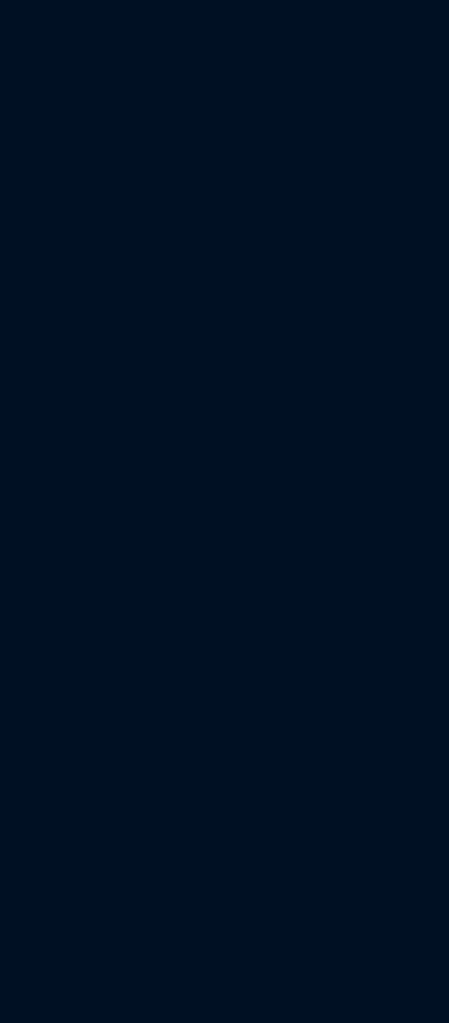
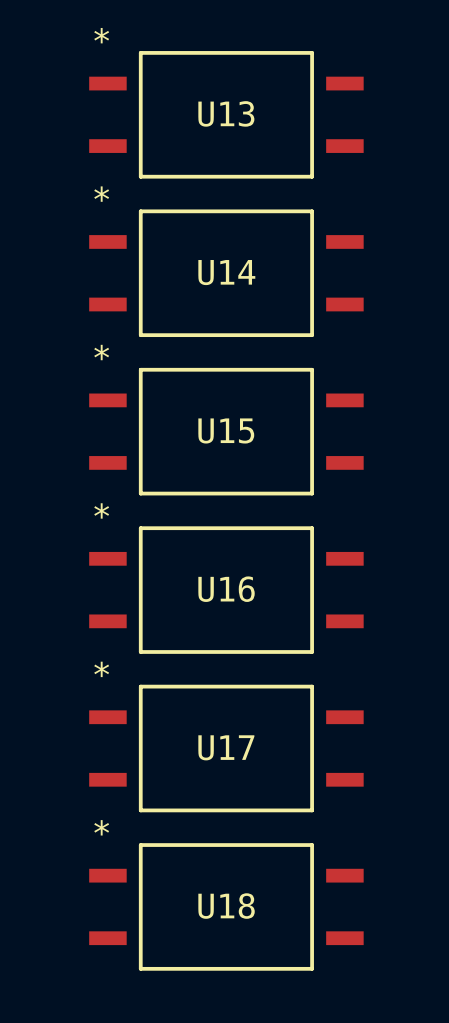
U13: none -> (226, 114)
U14: none -> (226, 273)
U15: none -> (226, 431)
U16: none -> (226, 590)
U17: none -> (226, 748)
U18: none -> (226, 906)

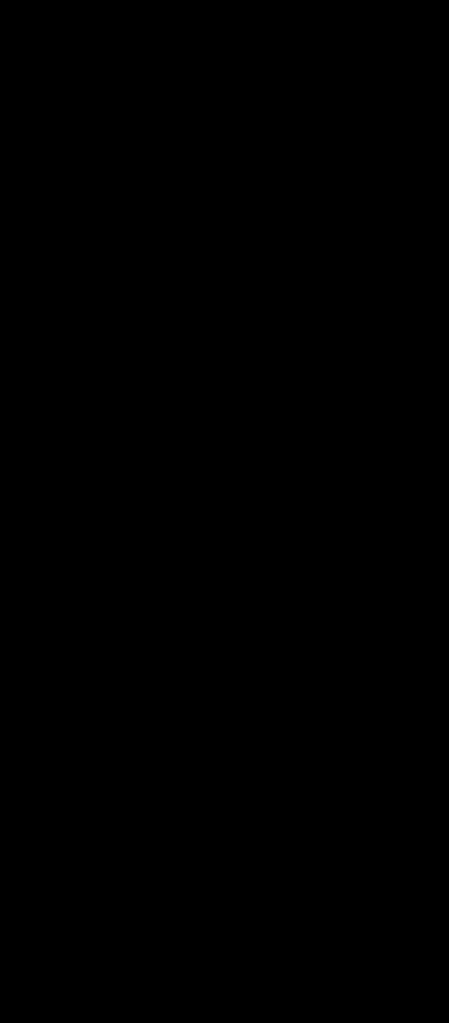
U13: (226, 114) -> none
U14: (226, 273) -> none
U15: (226, 431) -> none
U16: (226, 590) -> none
U17: (226, 748) -> none
U18: (226, 906) -> none

